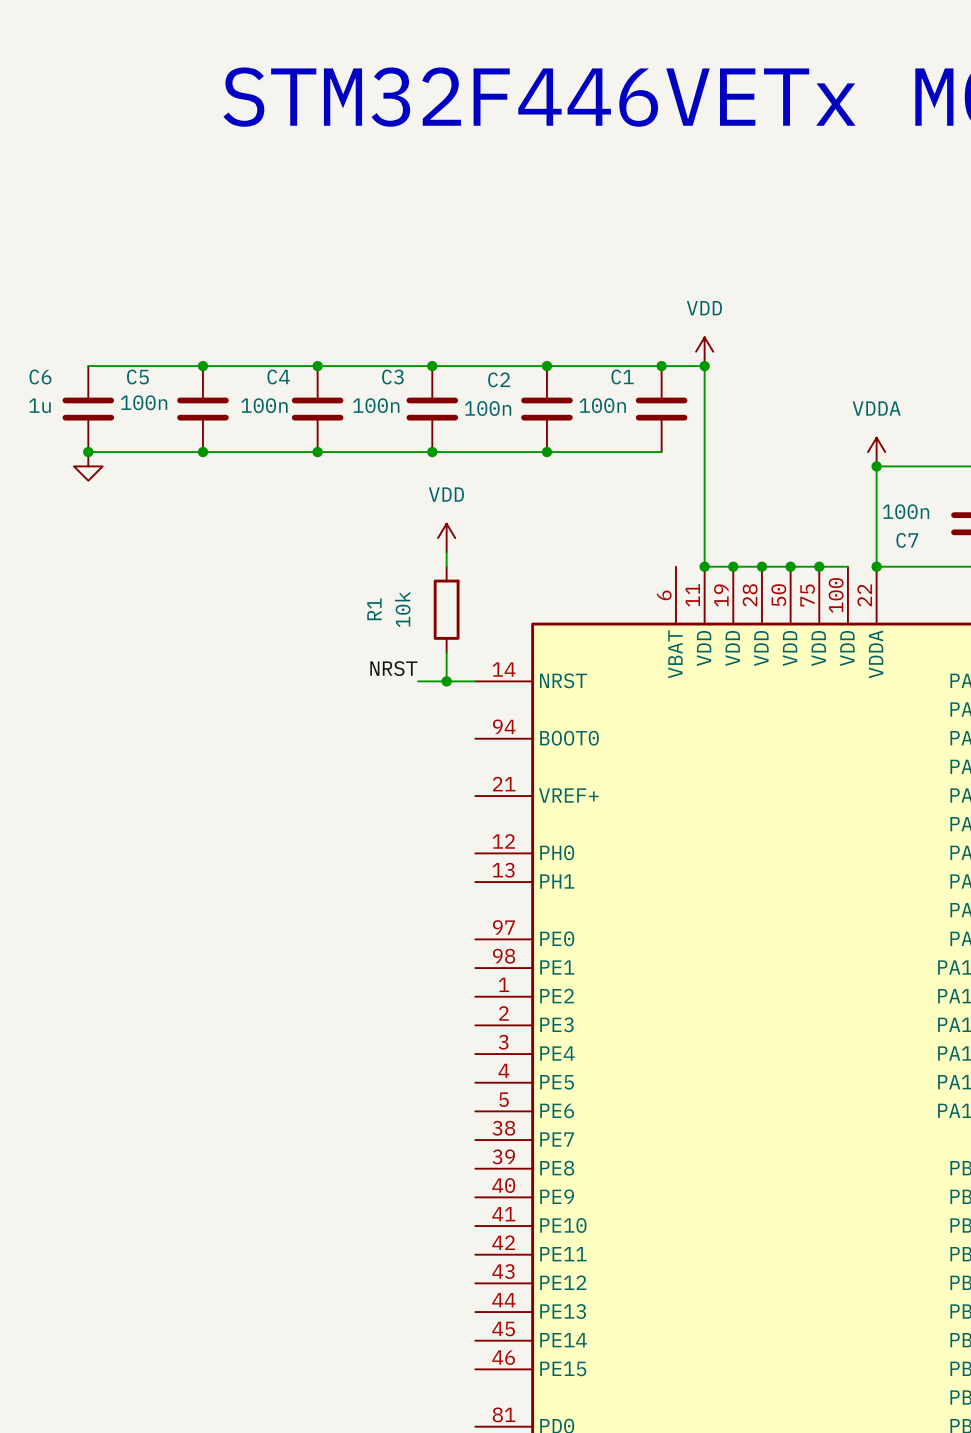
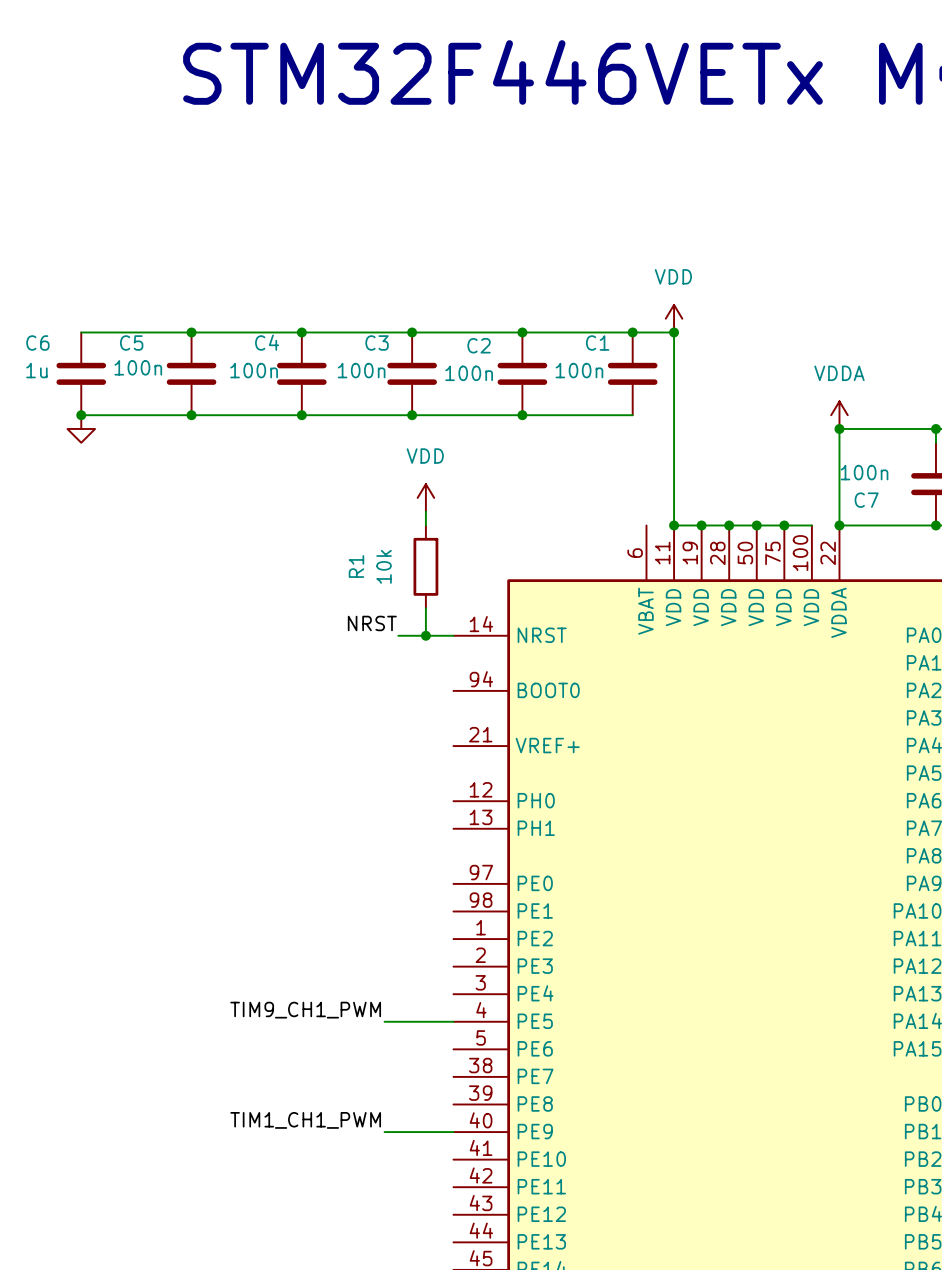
label: none -> TIM9_CH1_PWM (305, 1010)
wire: none -> (384, 1021) (453, 1021)
label: none -> TIM1_CH1_PWM (305, 1120)
wire: none -> (384, 1132) (453, 1132)

